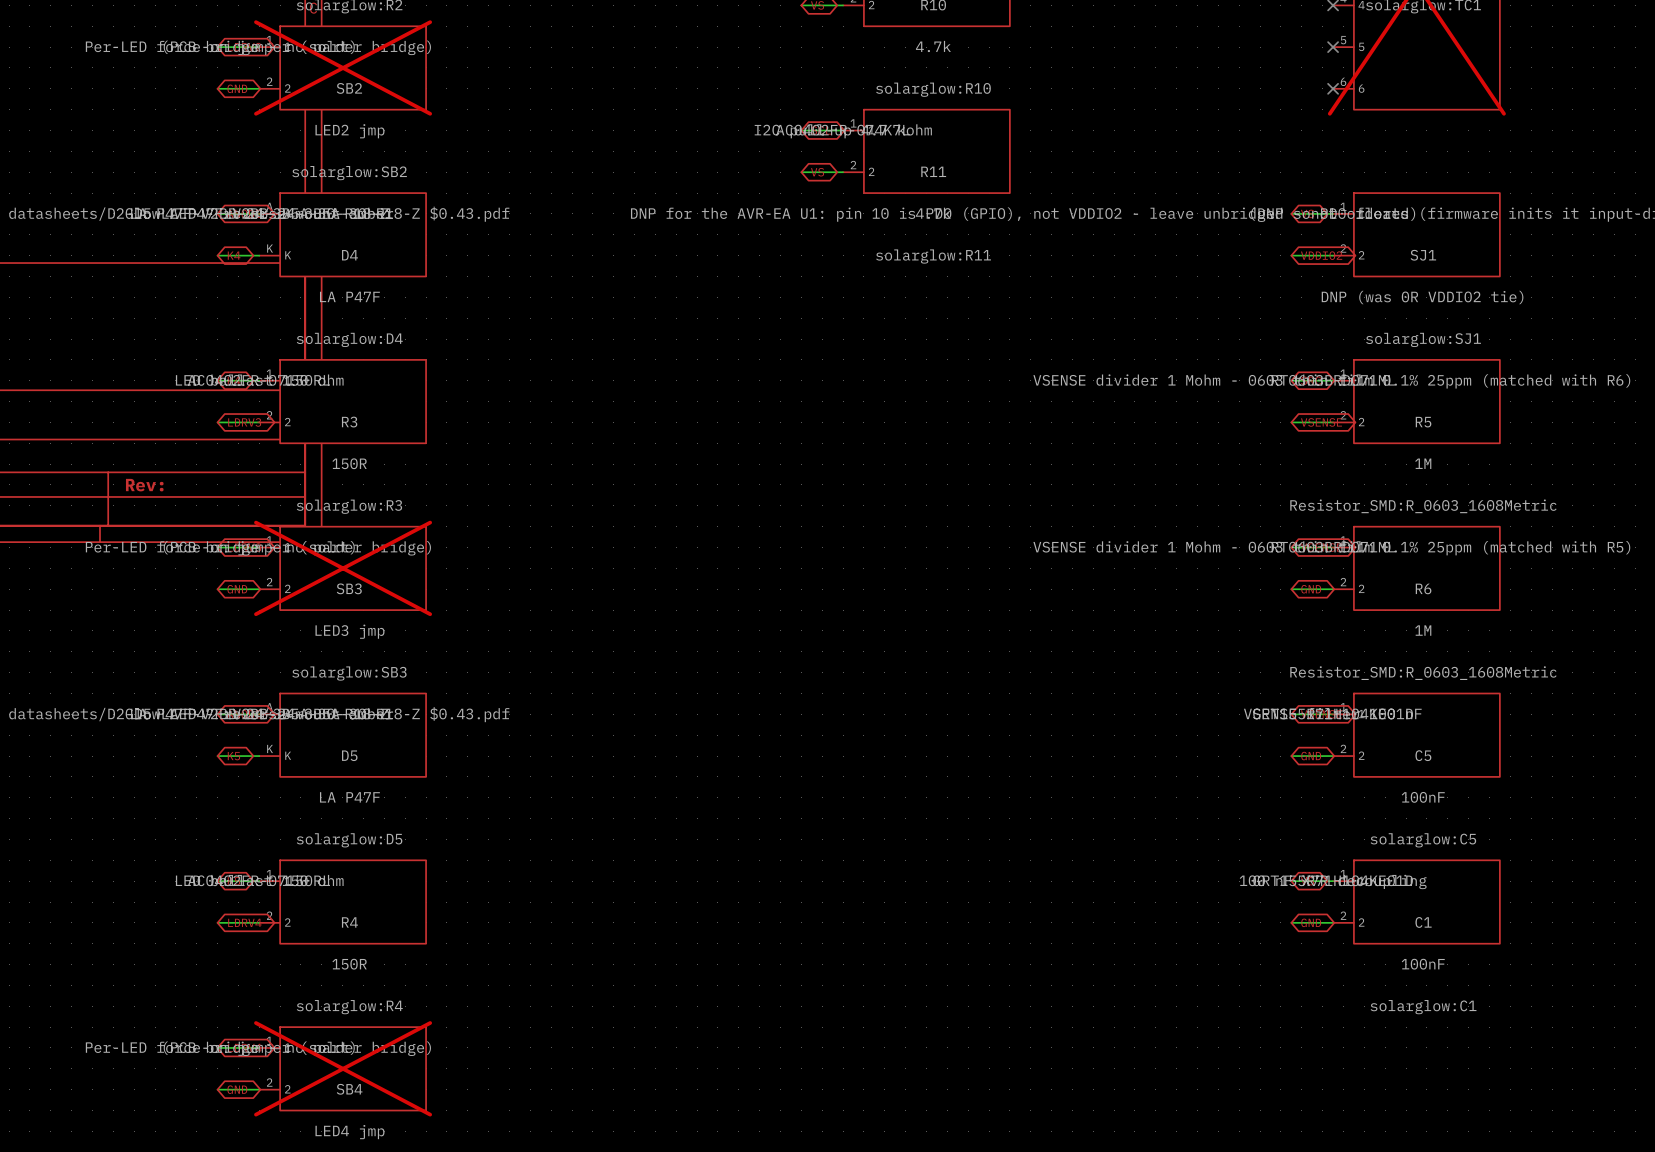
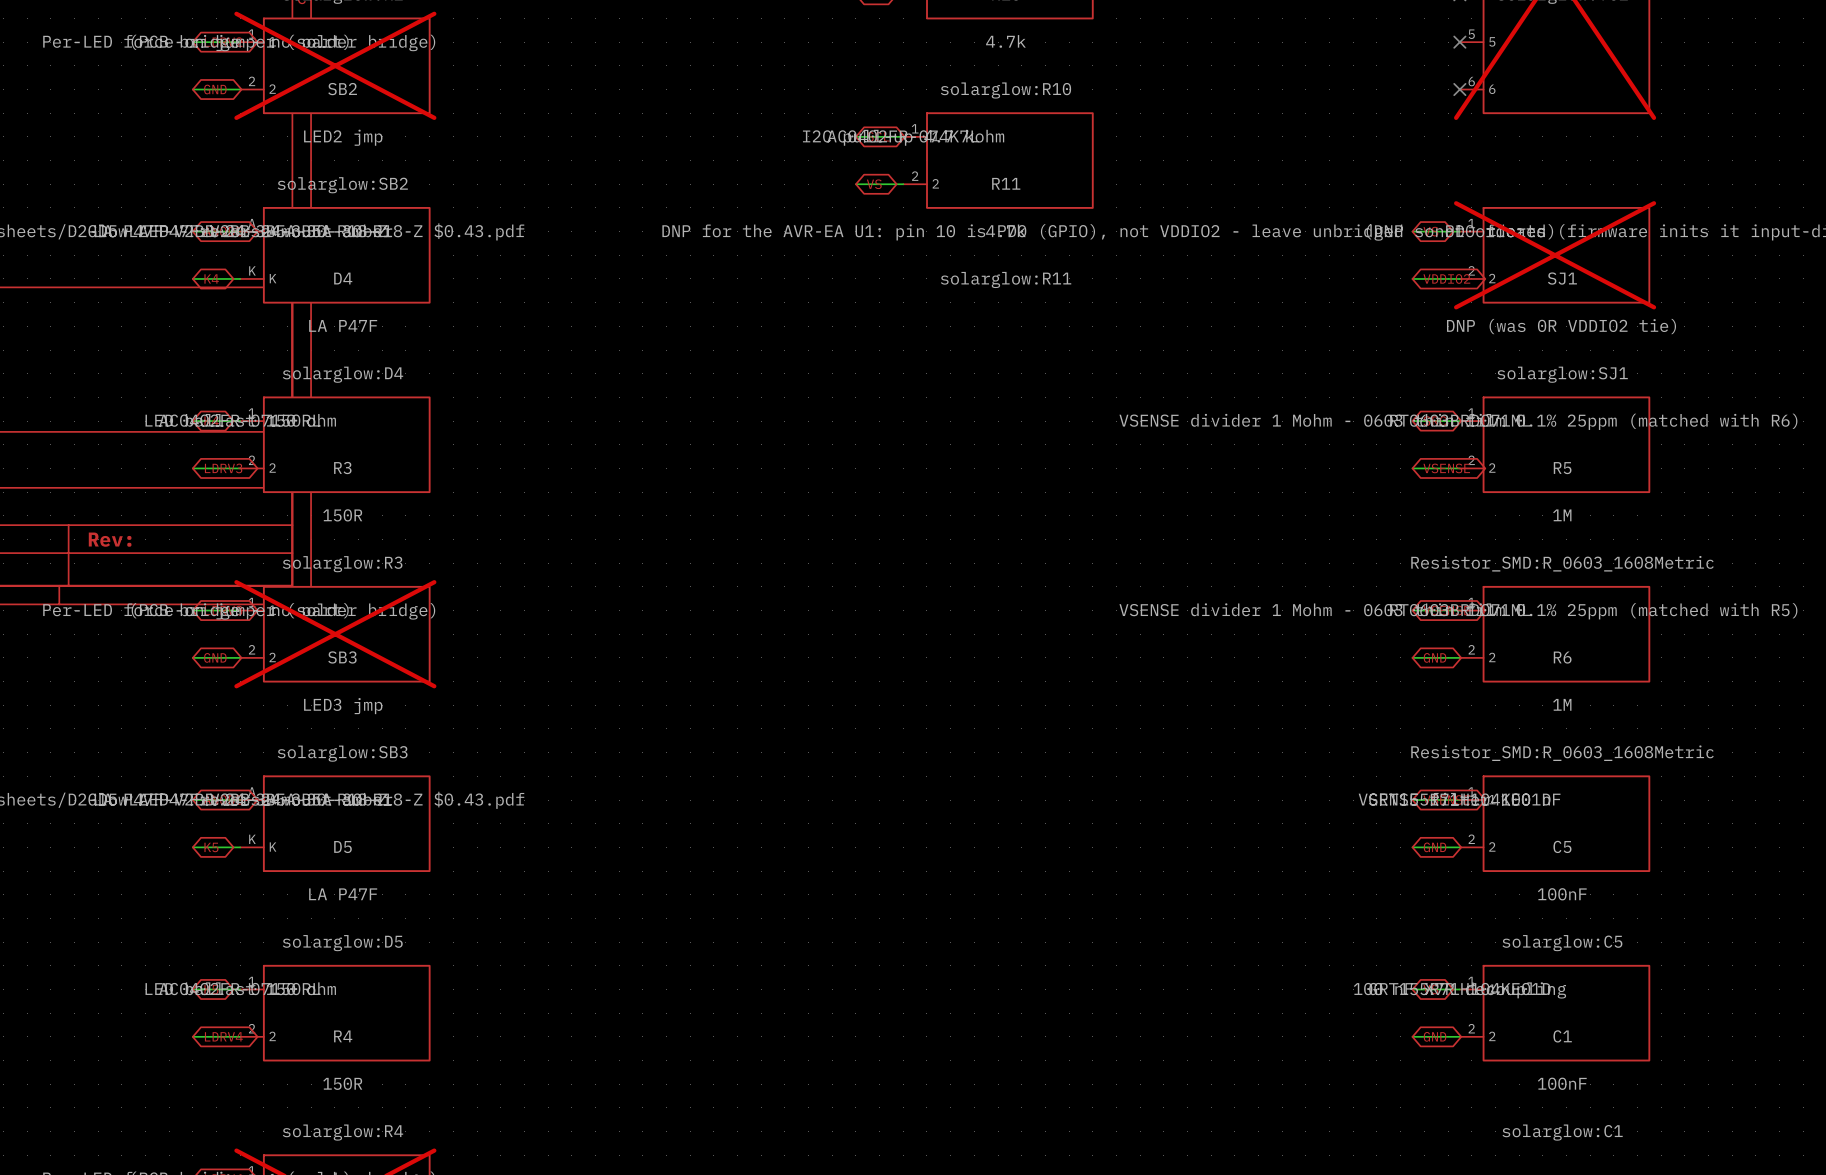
SJ1 do-not-place cross: none -> (1555, 255)

